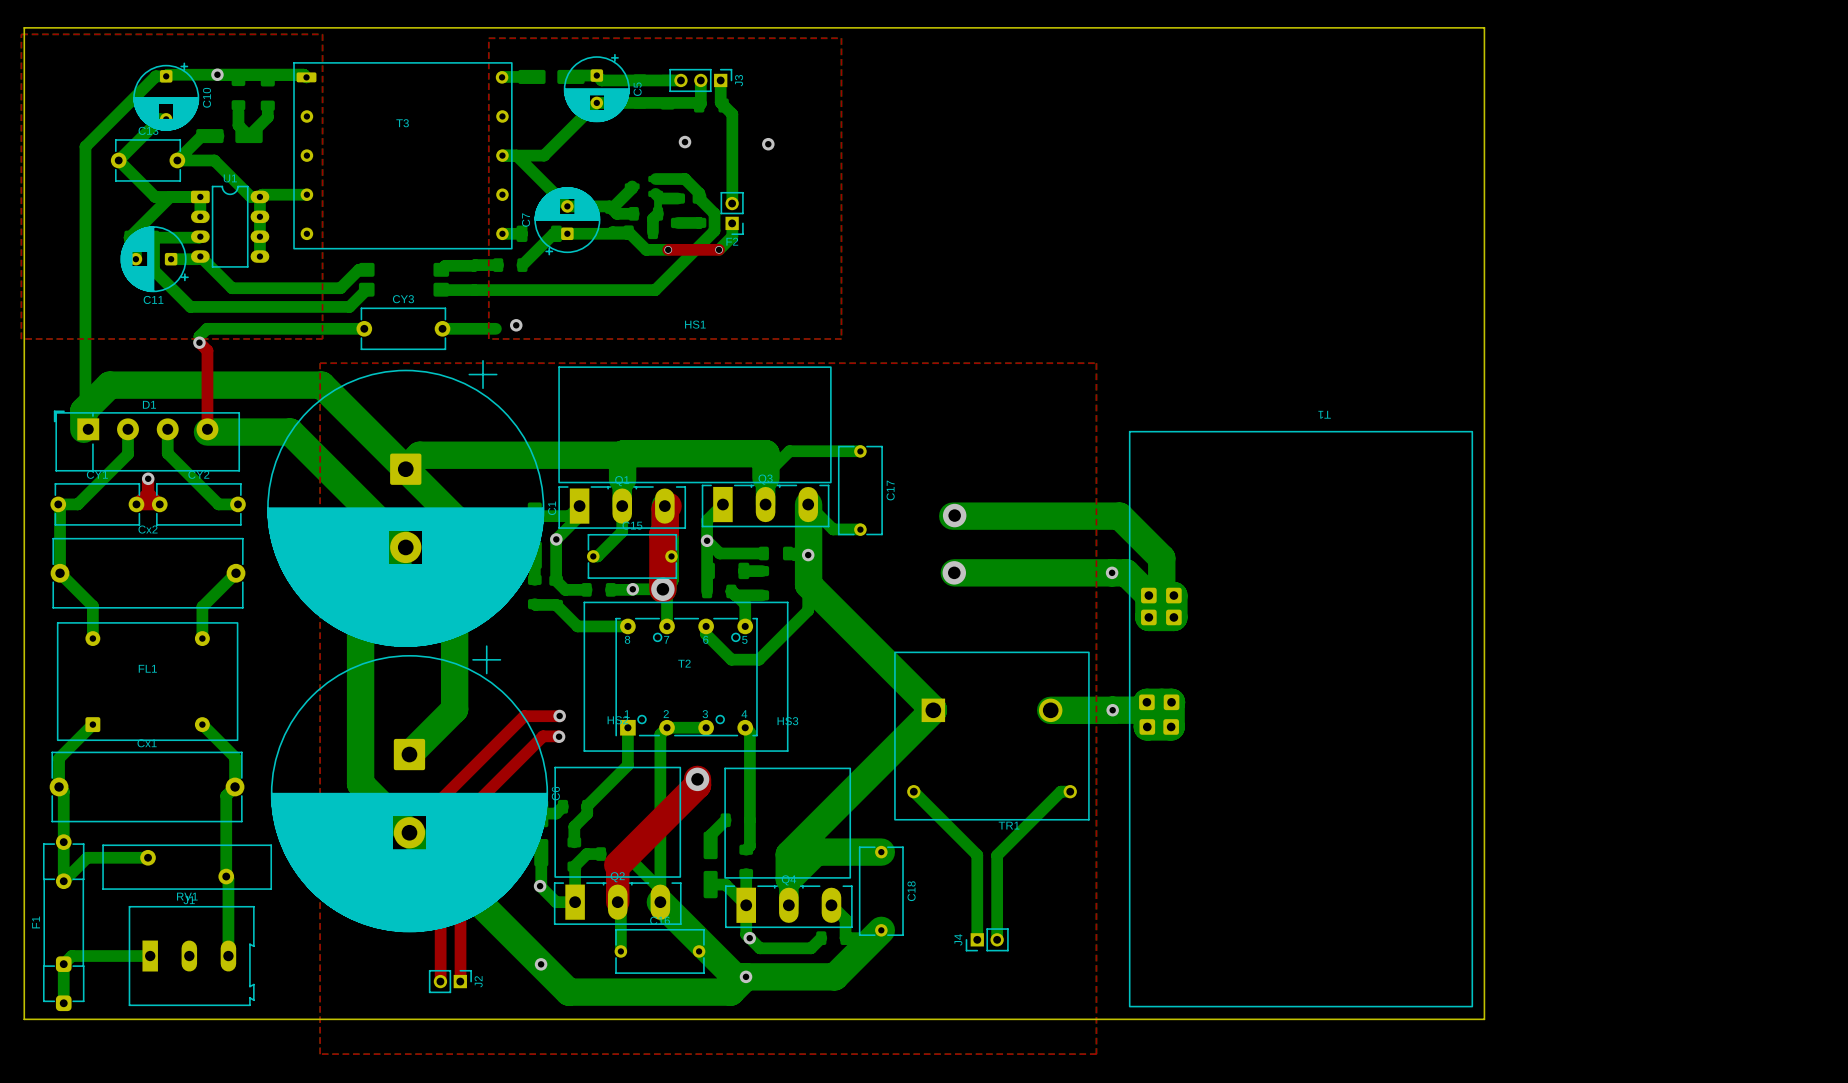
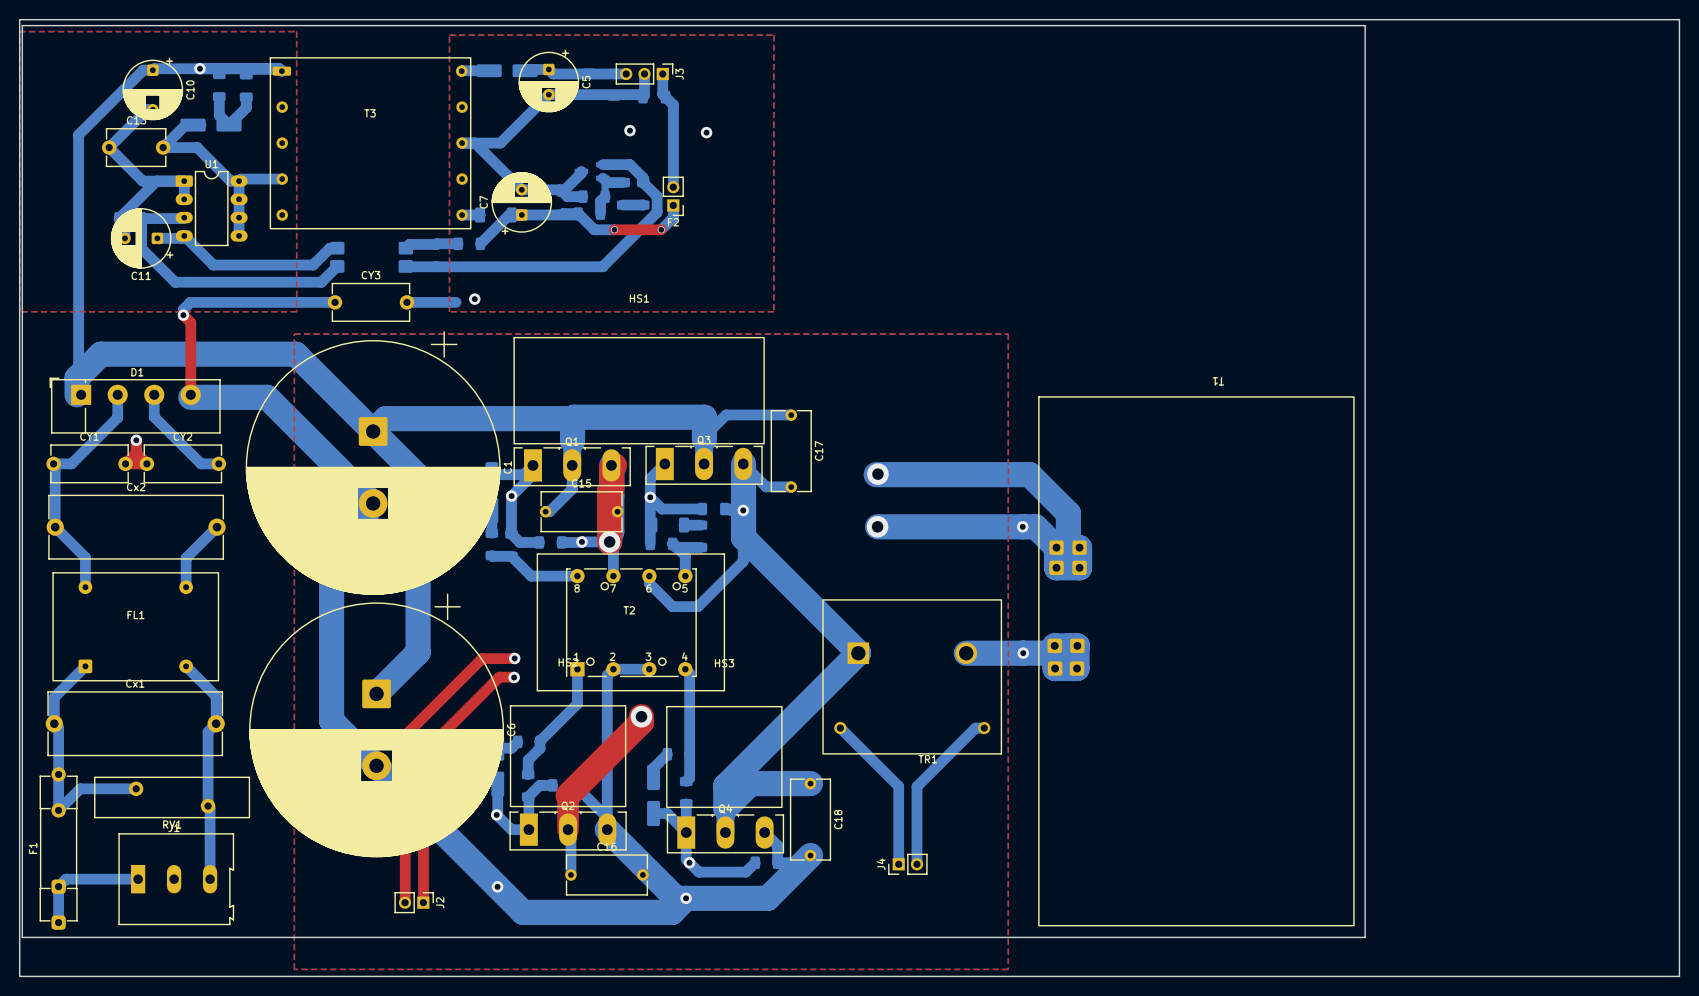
board edge: none -> (19, 19) (1679, 19) (1679, 976) (19, 976) (19, 19)

